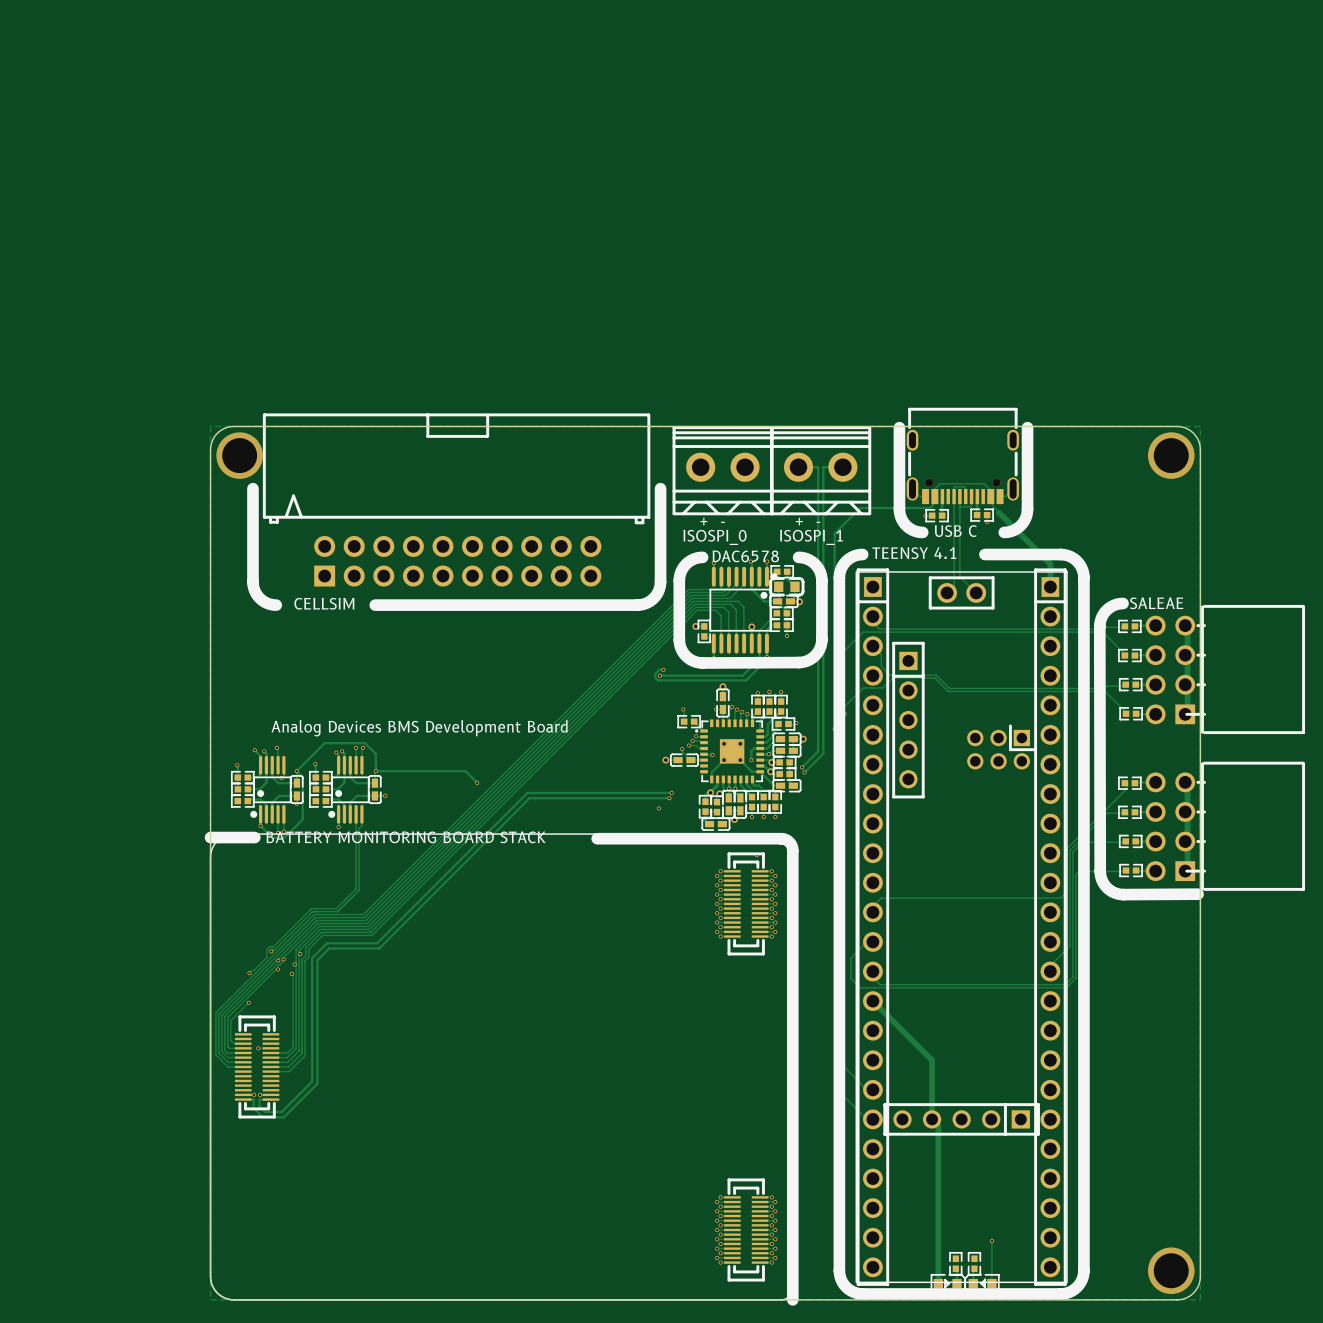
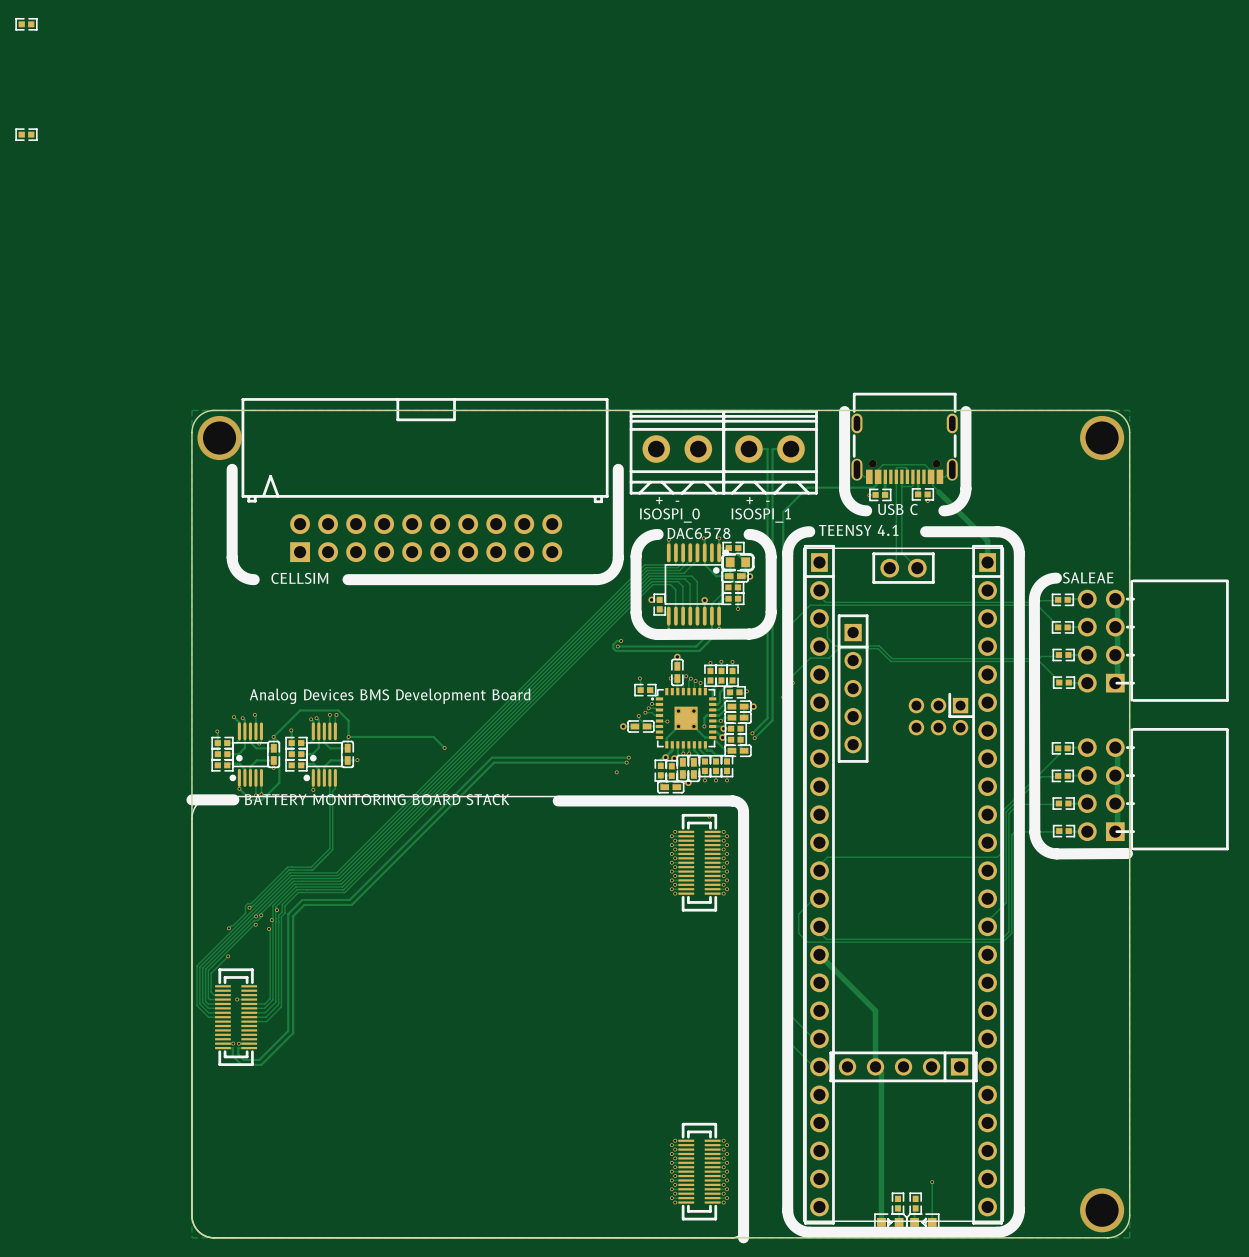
part: none -> (26, 24)
part: none -> (26, 134)

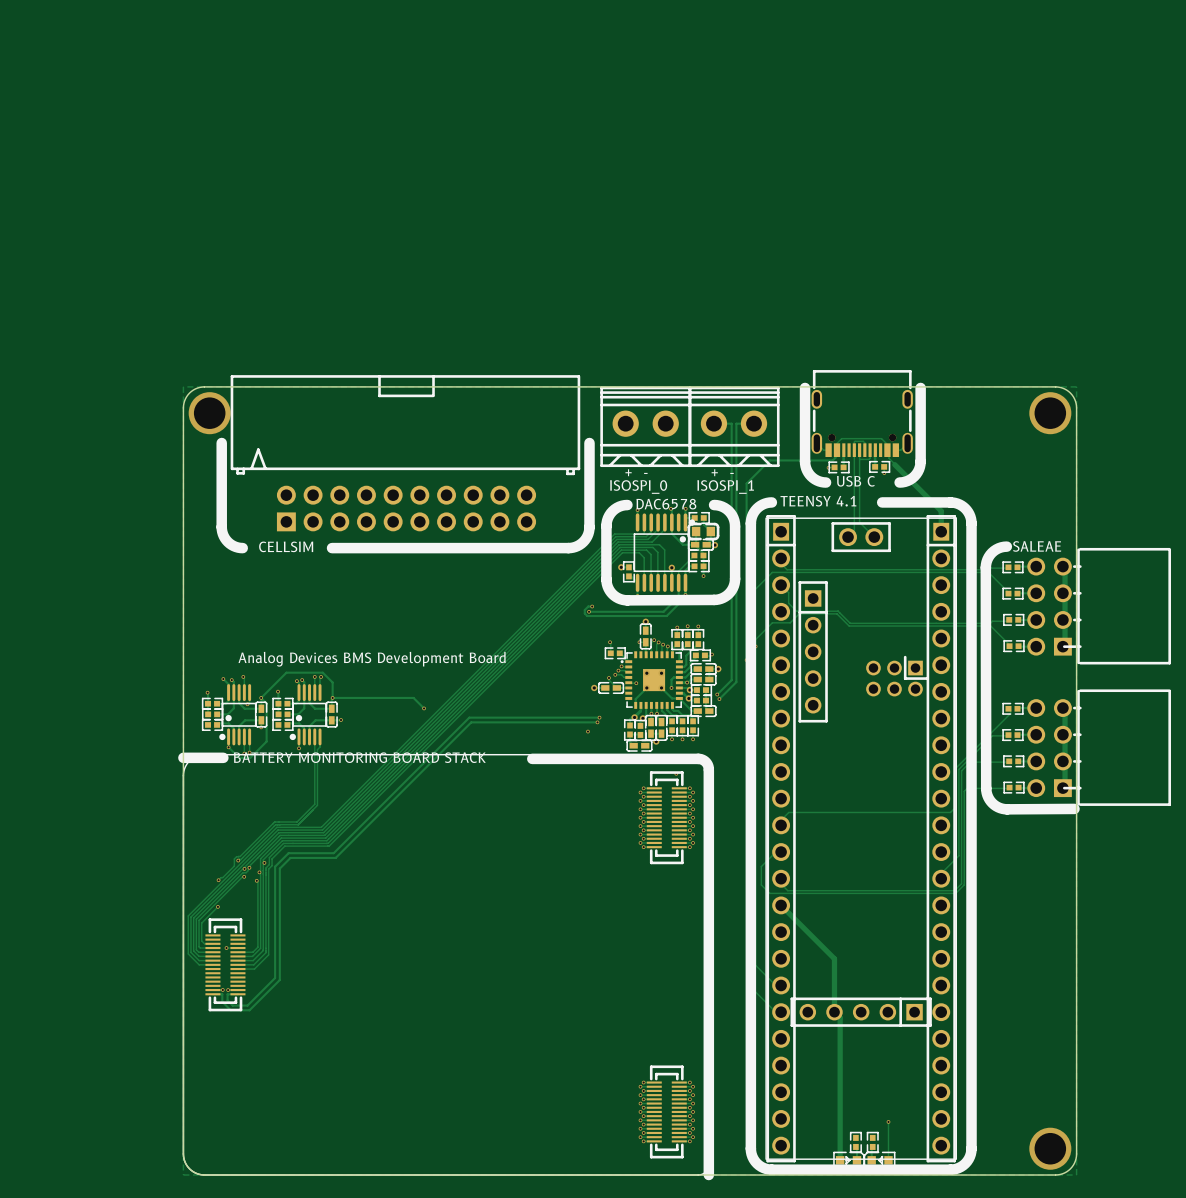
part: (26, 24) -> none
part: (26, 134) -> none

